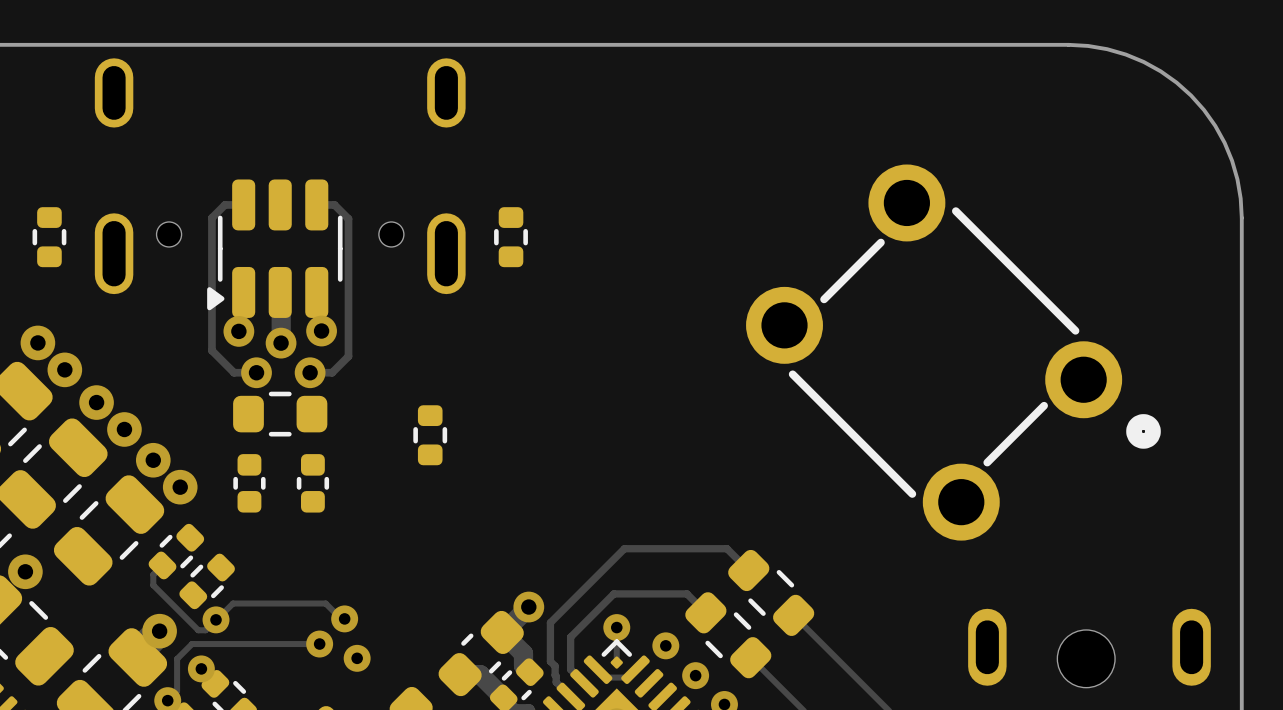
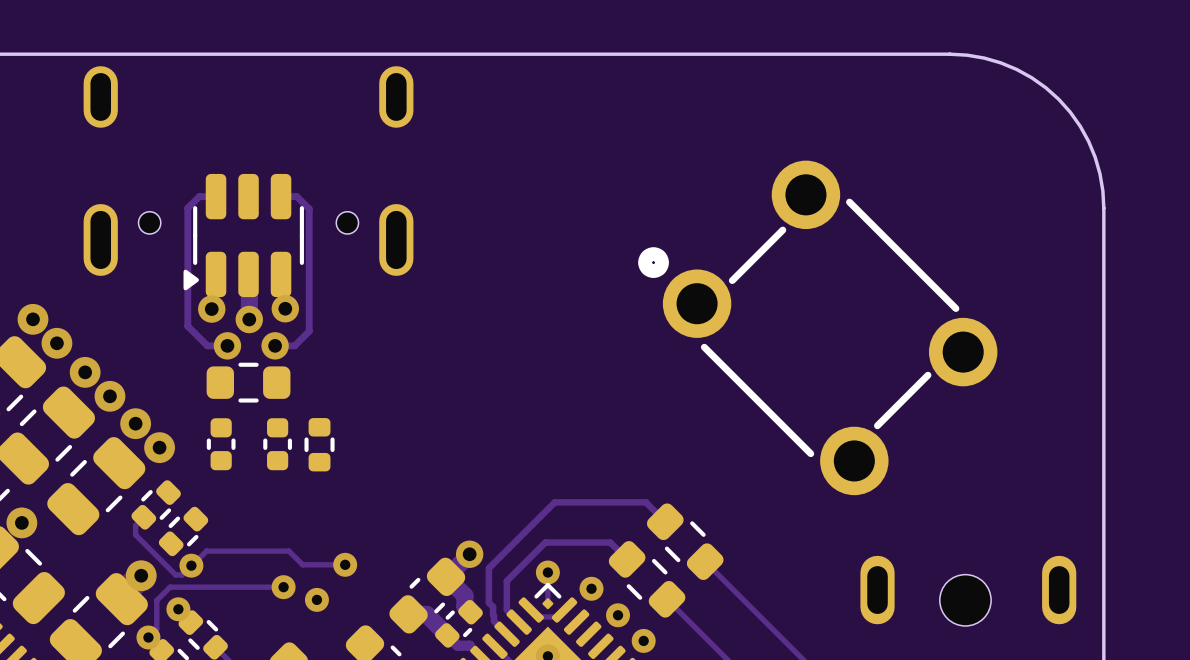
part footprint: [746, 164, 1161, 541] -> [638, 160, 998, 496]
part: (49, 237) -> none
part: (511, 237) -> none
part position: (430, 435) -> (319, 444)
track: none -> (305, 564) (345, 564)
via position: (344, 618) -> (345, 564)

